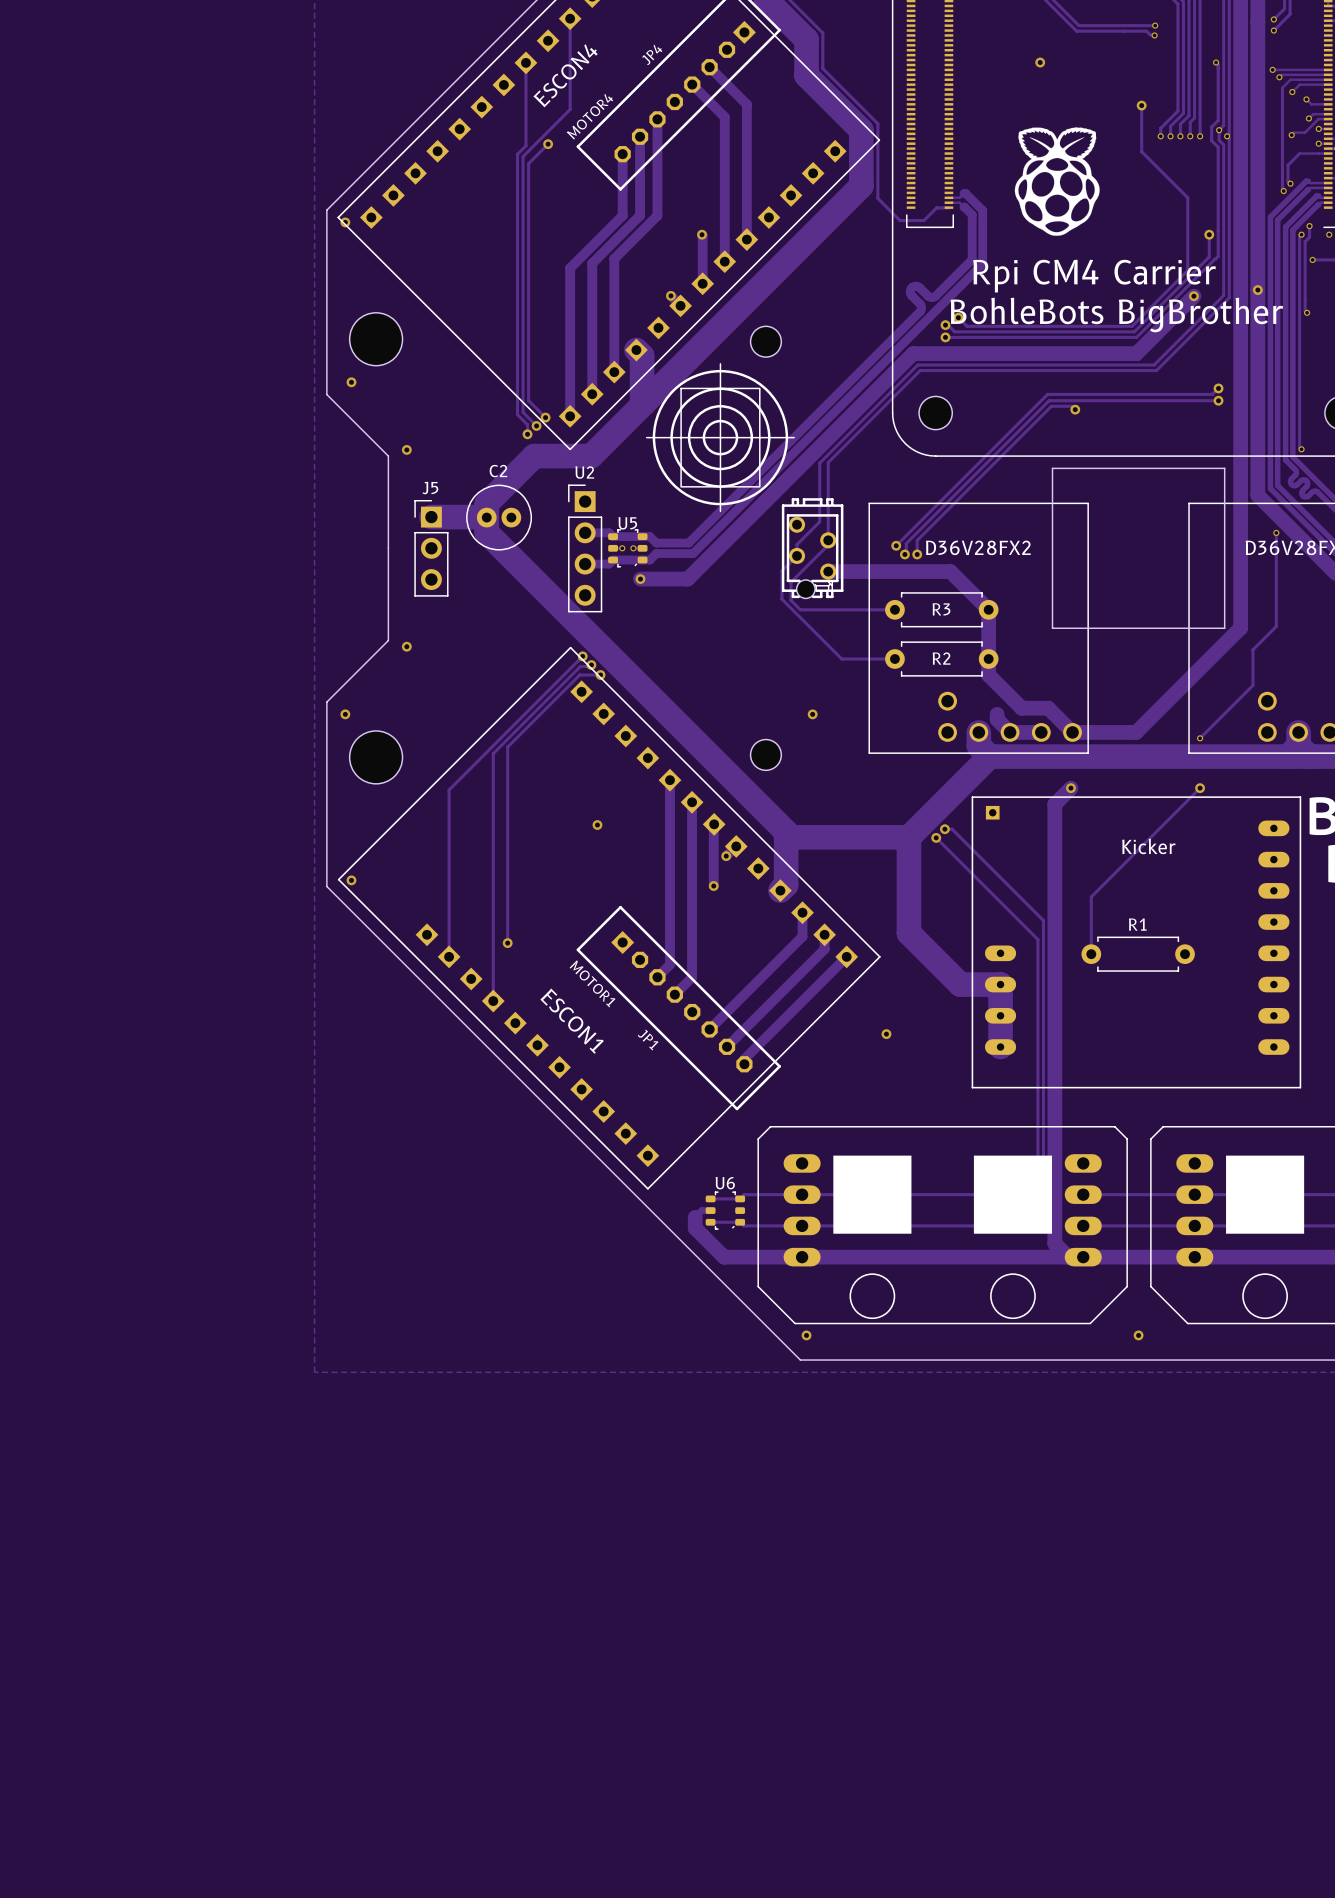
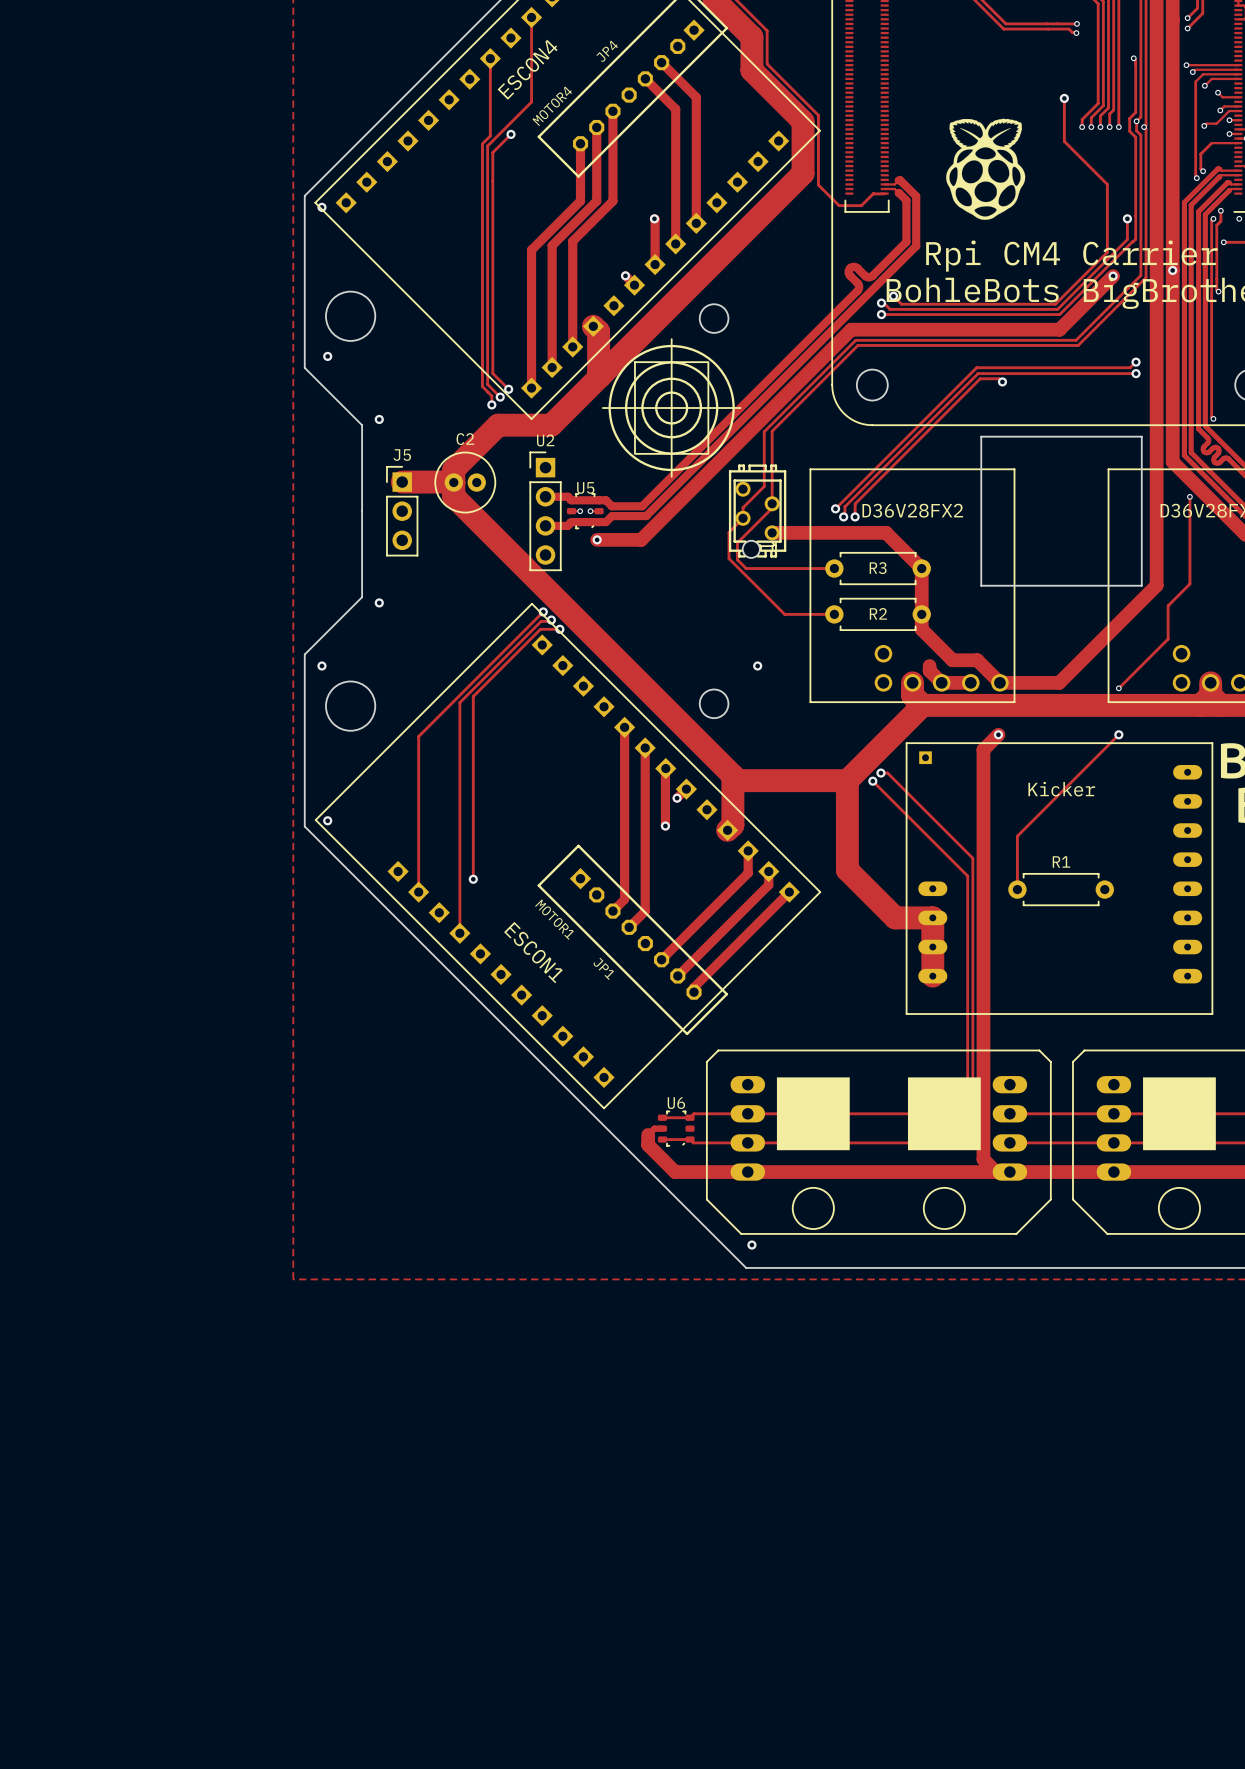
via: (1040, 62) -> none
via: (597, 825) -> none
via: (886, 1034) -> none
via: (1138, 1335) -> none

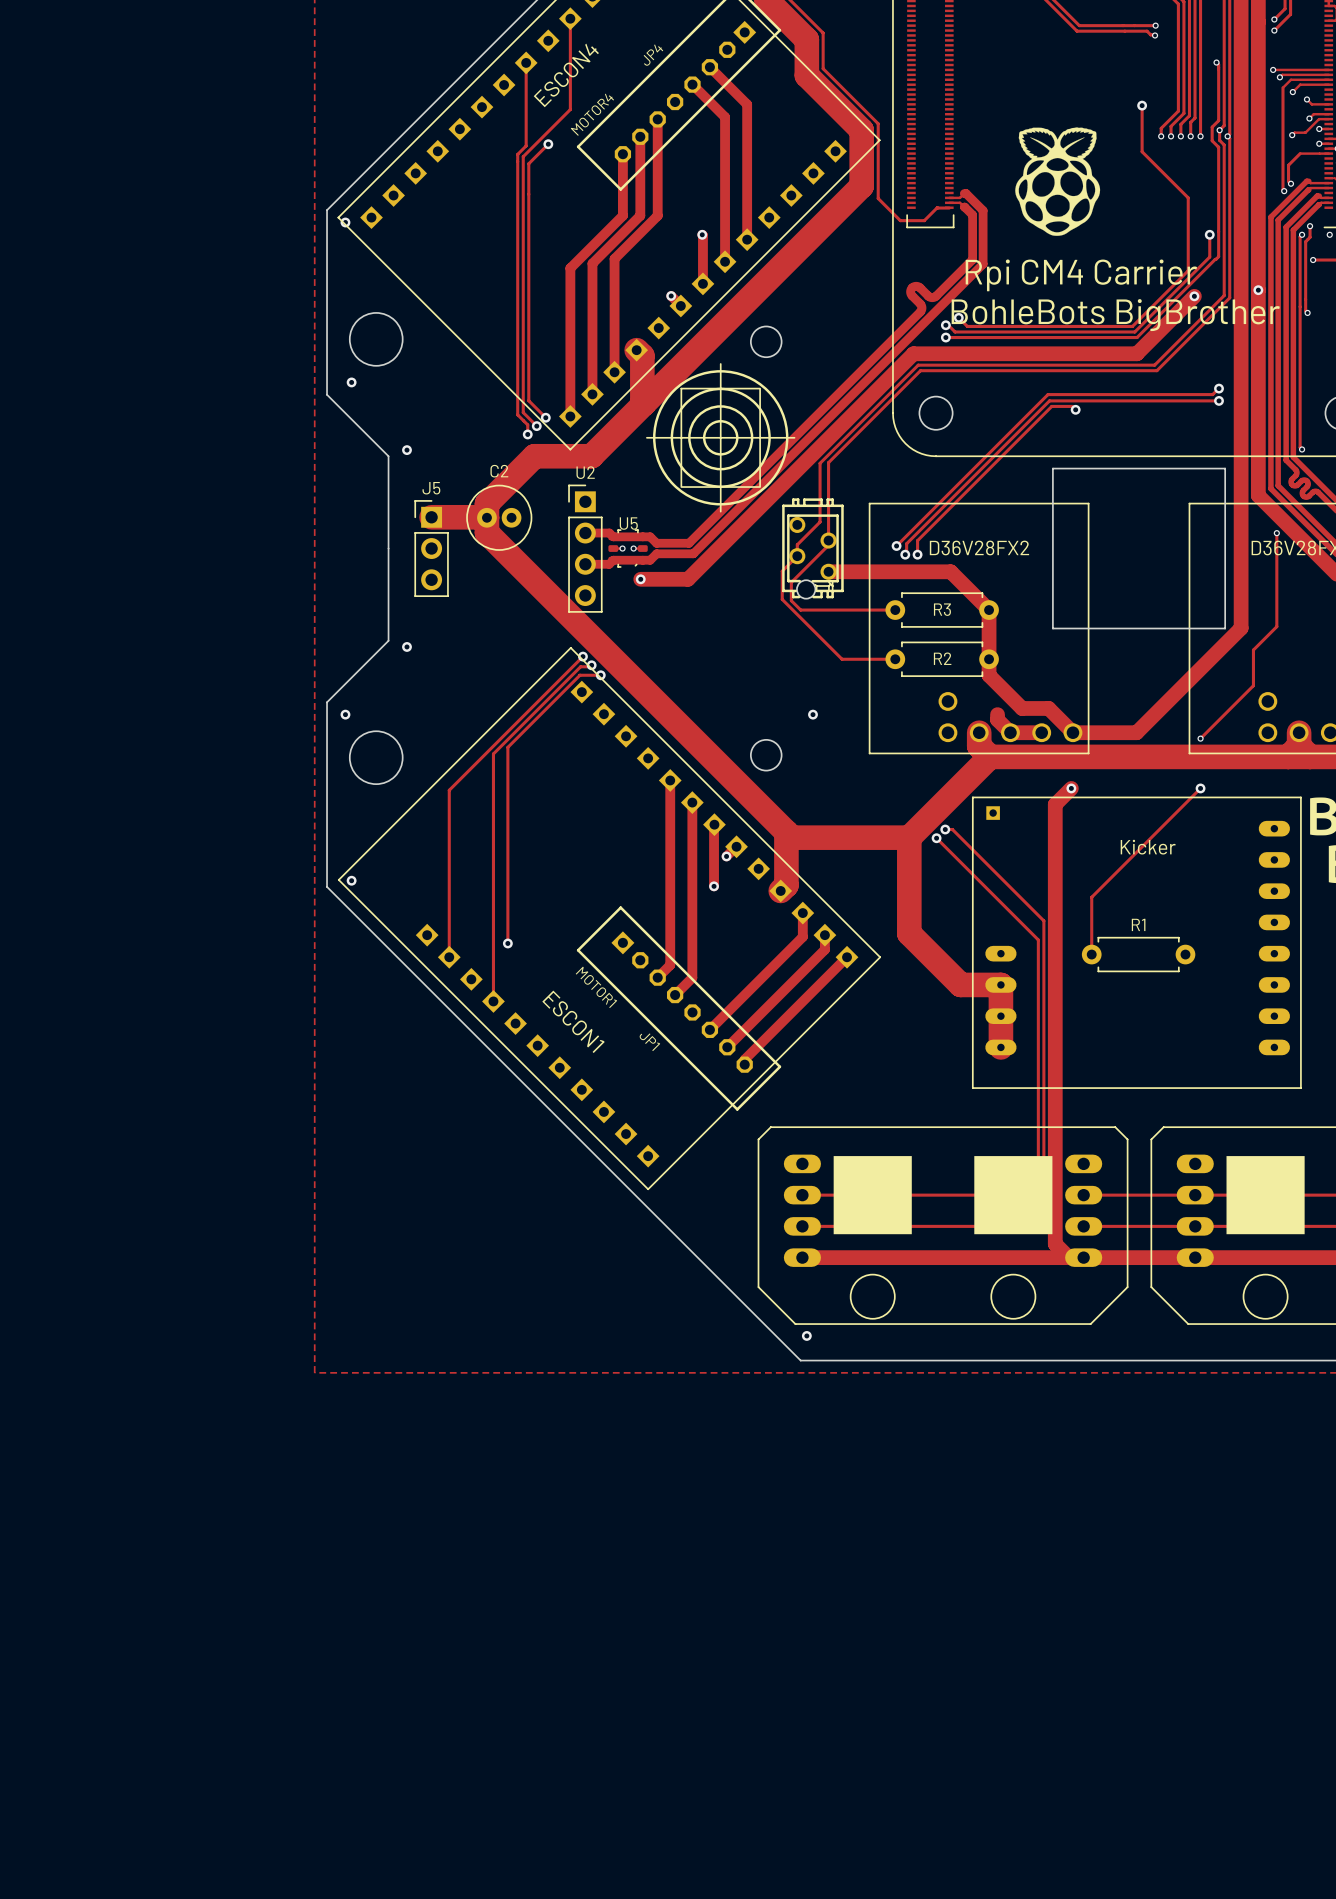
track: (747, 1113) (693, 1113) (690, 1117) (662, 1117) -> none
track: (662, 1128) (654, 1128) (648, 1134) (648, 1145) (675, 1172) (747, 1172) -> none
U6: (676, 1128) -> none
track: (662, 1139) (690, 1139) (693, 1142) (747, 1142) -> none

